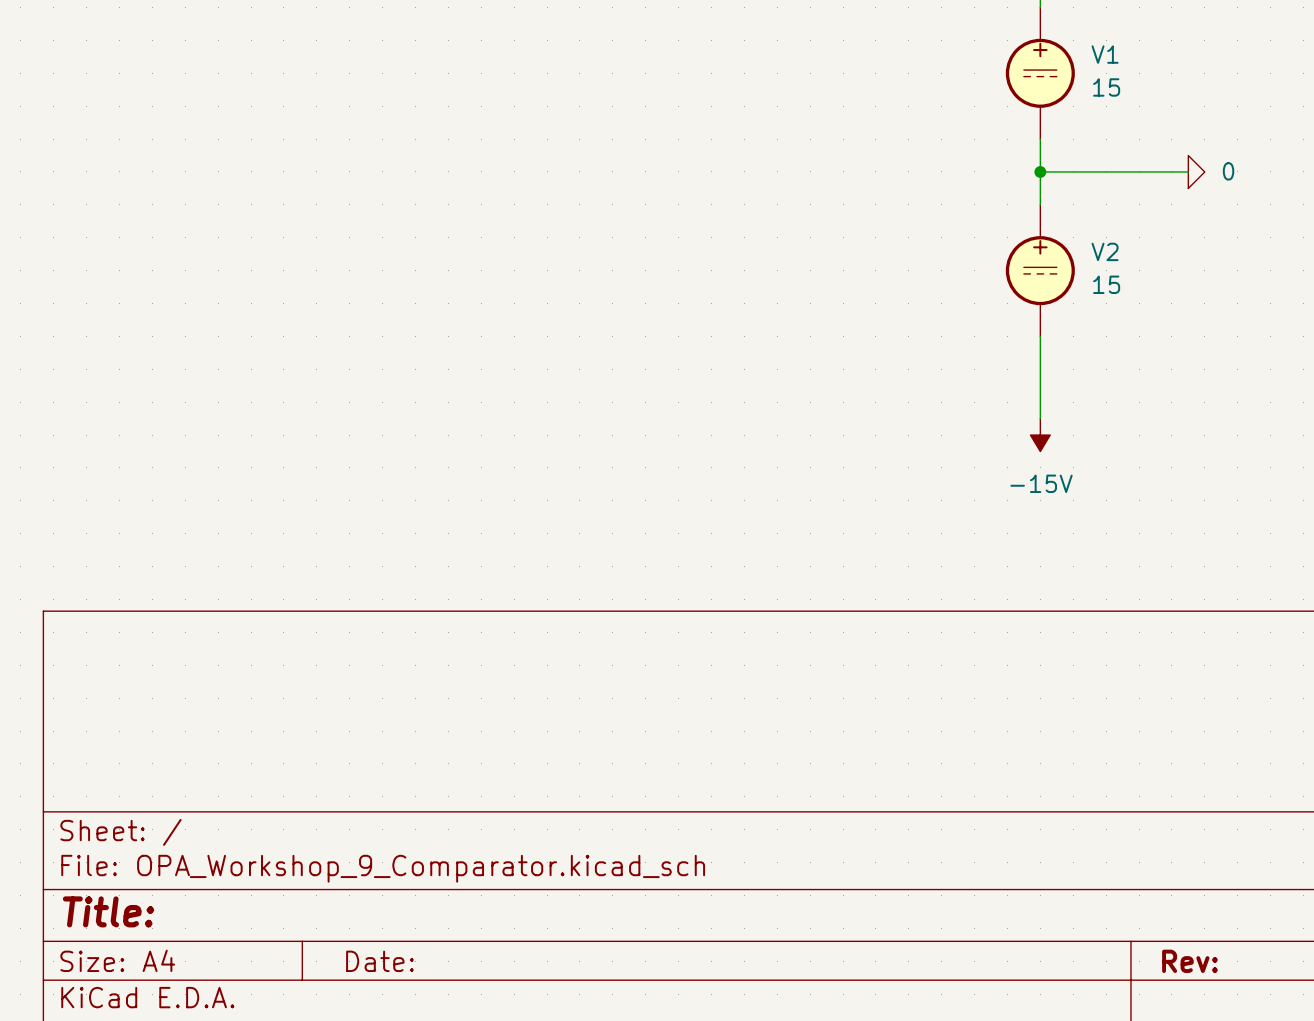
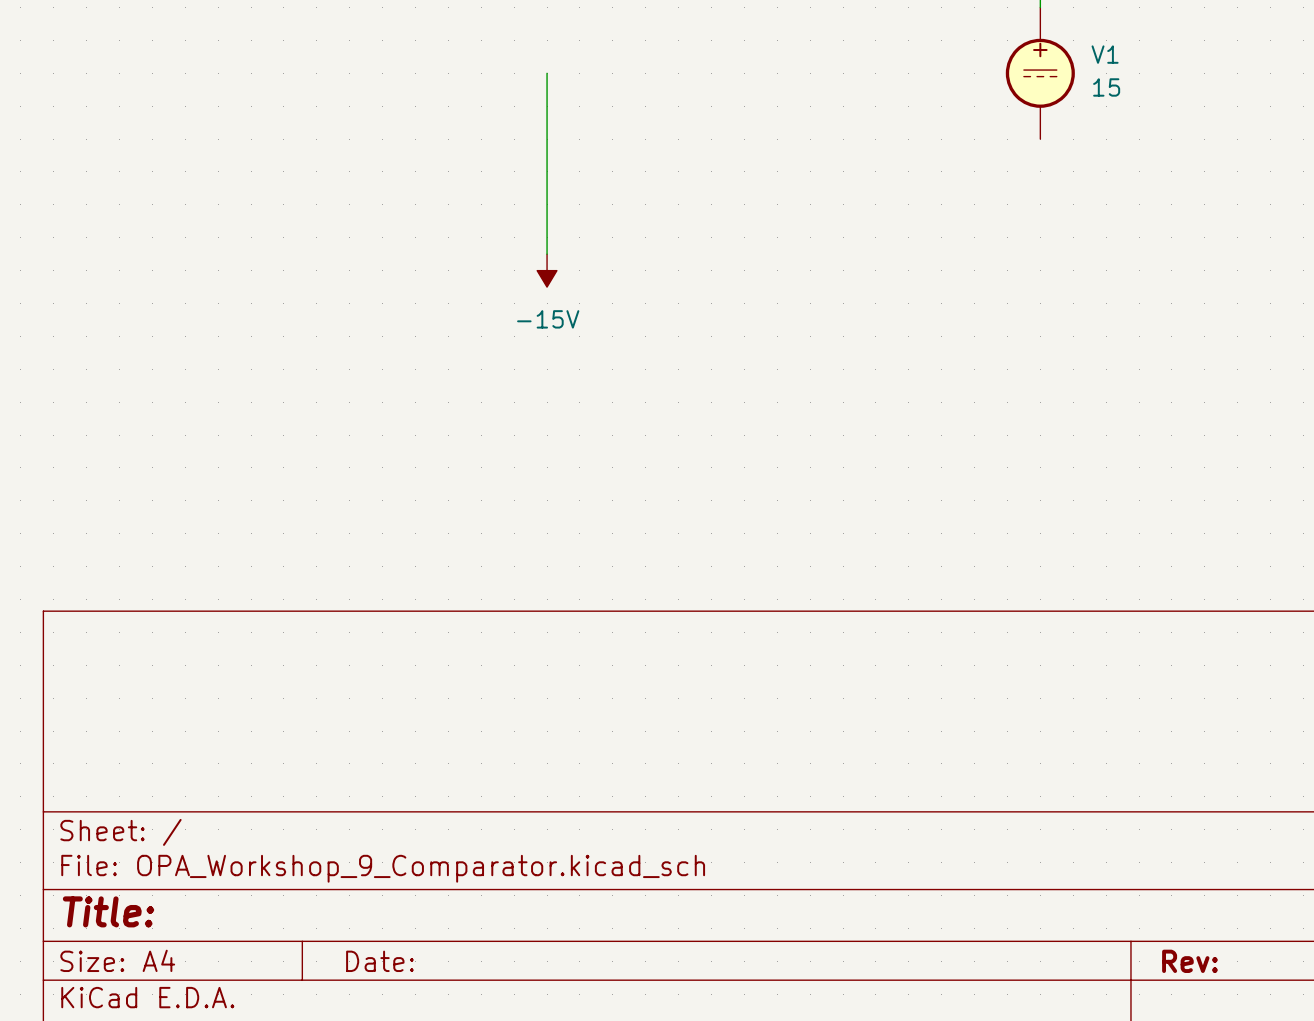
wire: none -> (547, 73) (547, 254)
wire: (1040, 139) (1040, 204) -> none
wire: (1040, 171) (1188, 171) -> none
junction: (1040, 171) -> none
power symbol: 0 (1196, 171) -> none
power symbol: none -> -15V (547, 270)
V2: 15 (1040, 270) -> none
wire: (1040, 336) (1040, 418) -> none
power symbol: -15V (1040, 435) -> none

